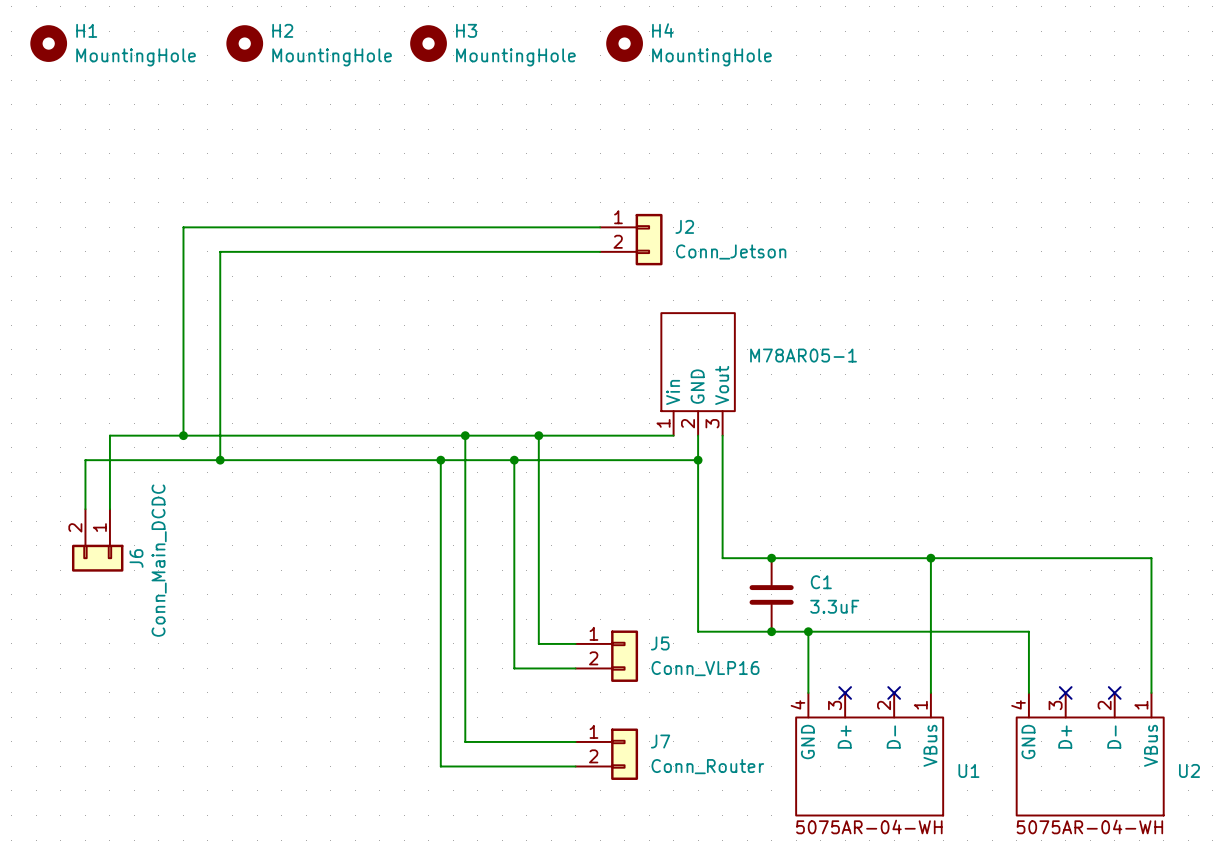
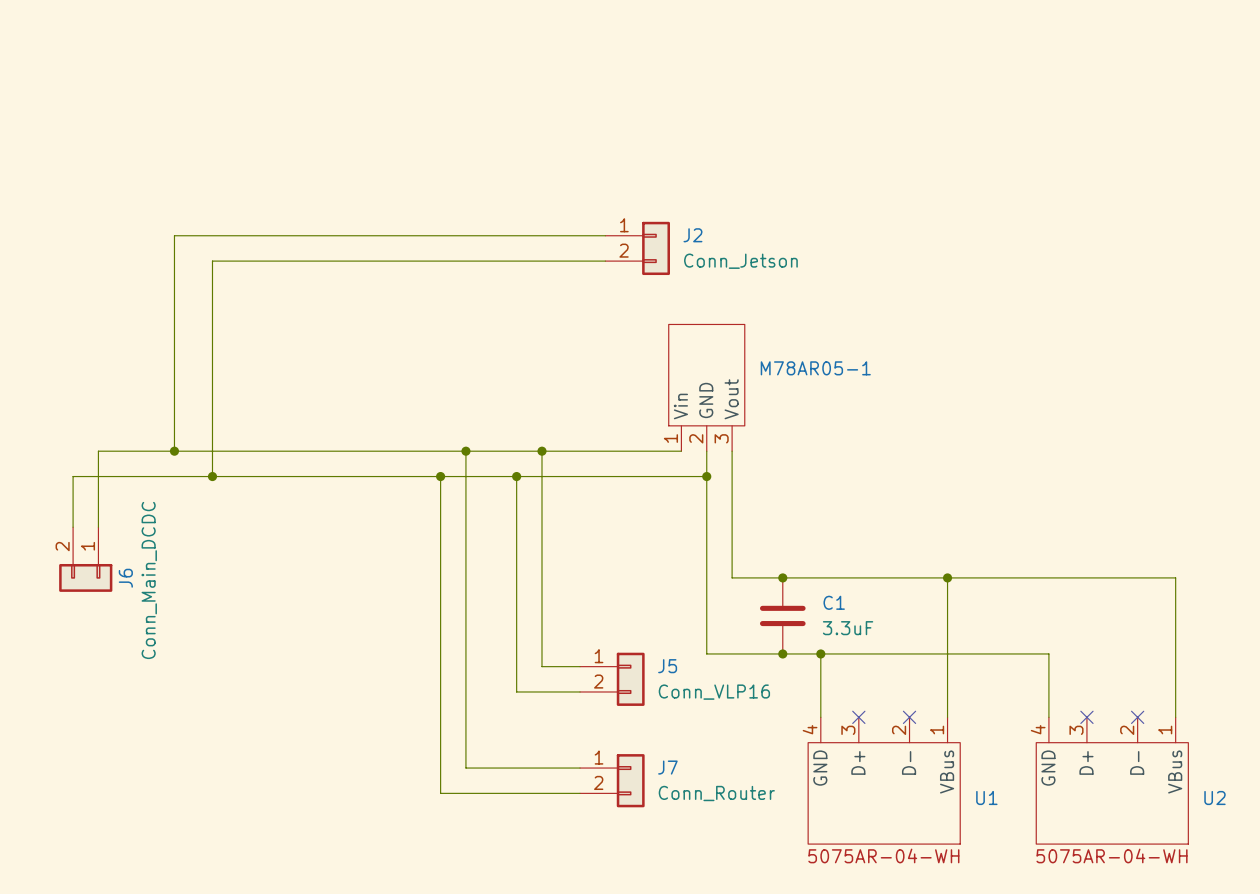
H1: MountingHole (48, 43) -> none
H2: MountingHole (244, 43) -> none
H3: MountingHole (428, 43) -> none
H4: MountingHole (624, 43) -> none

